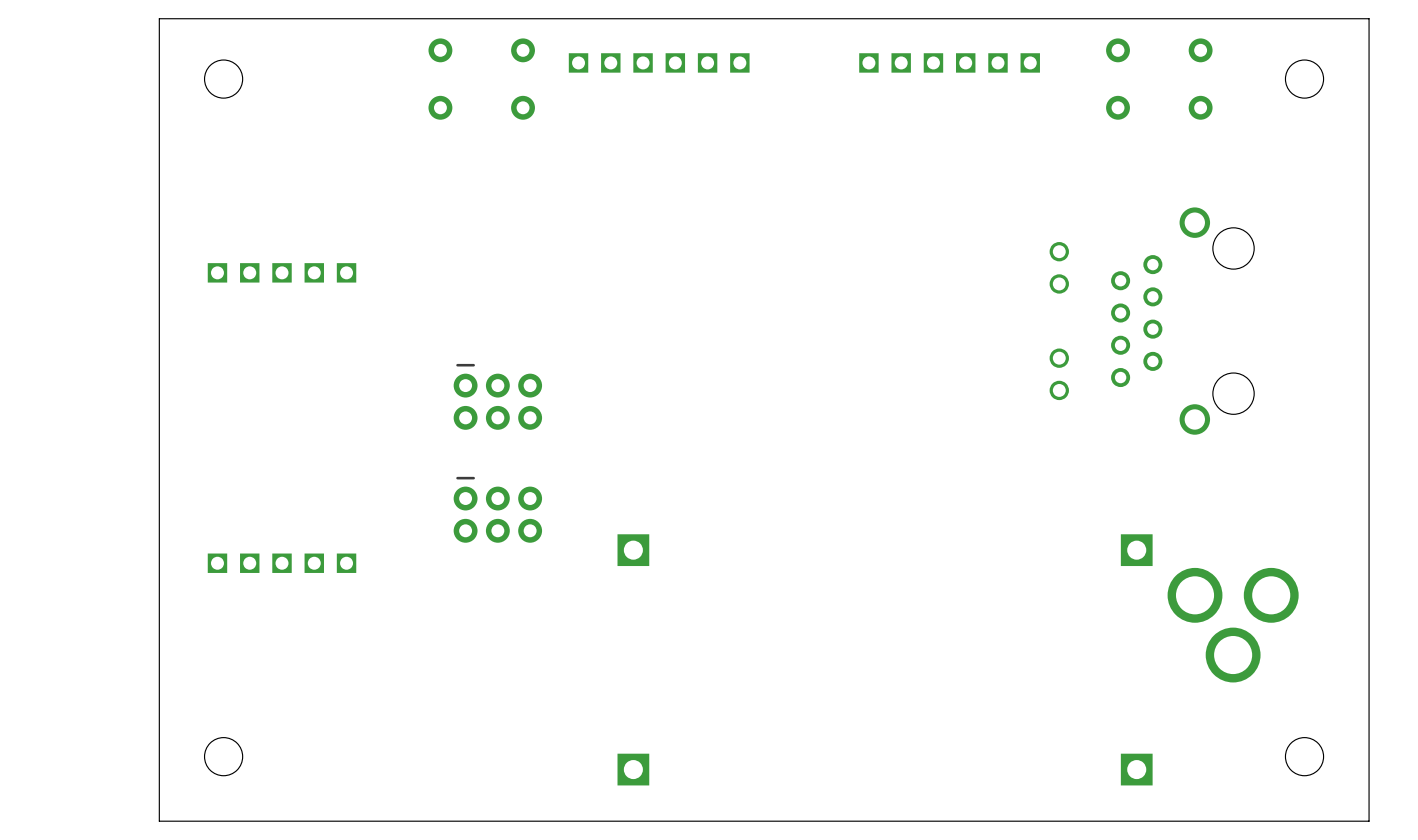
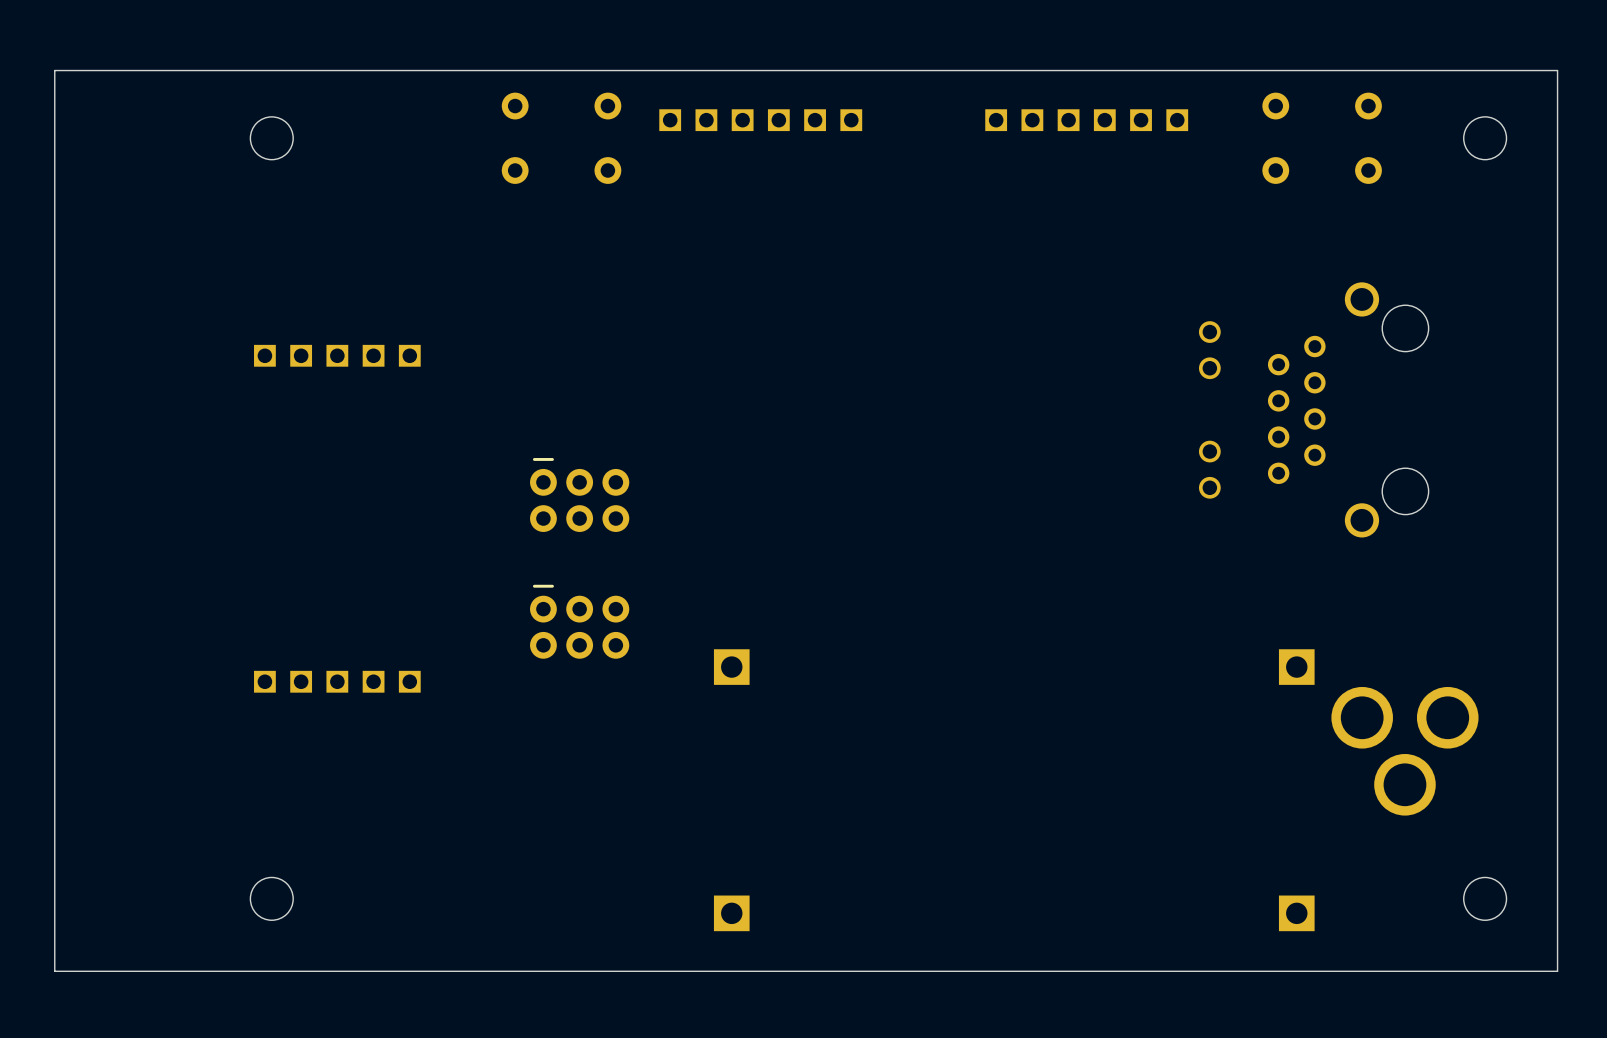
board edge: (159, 18) (159, 821) -> (199, 70) (54, 70) (54, 971) (199, 971)

